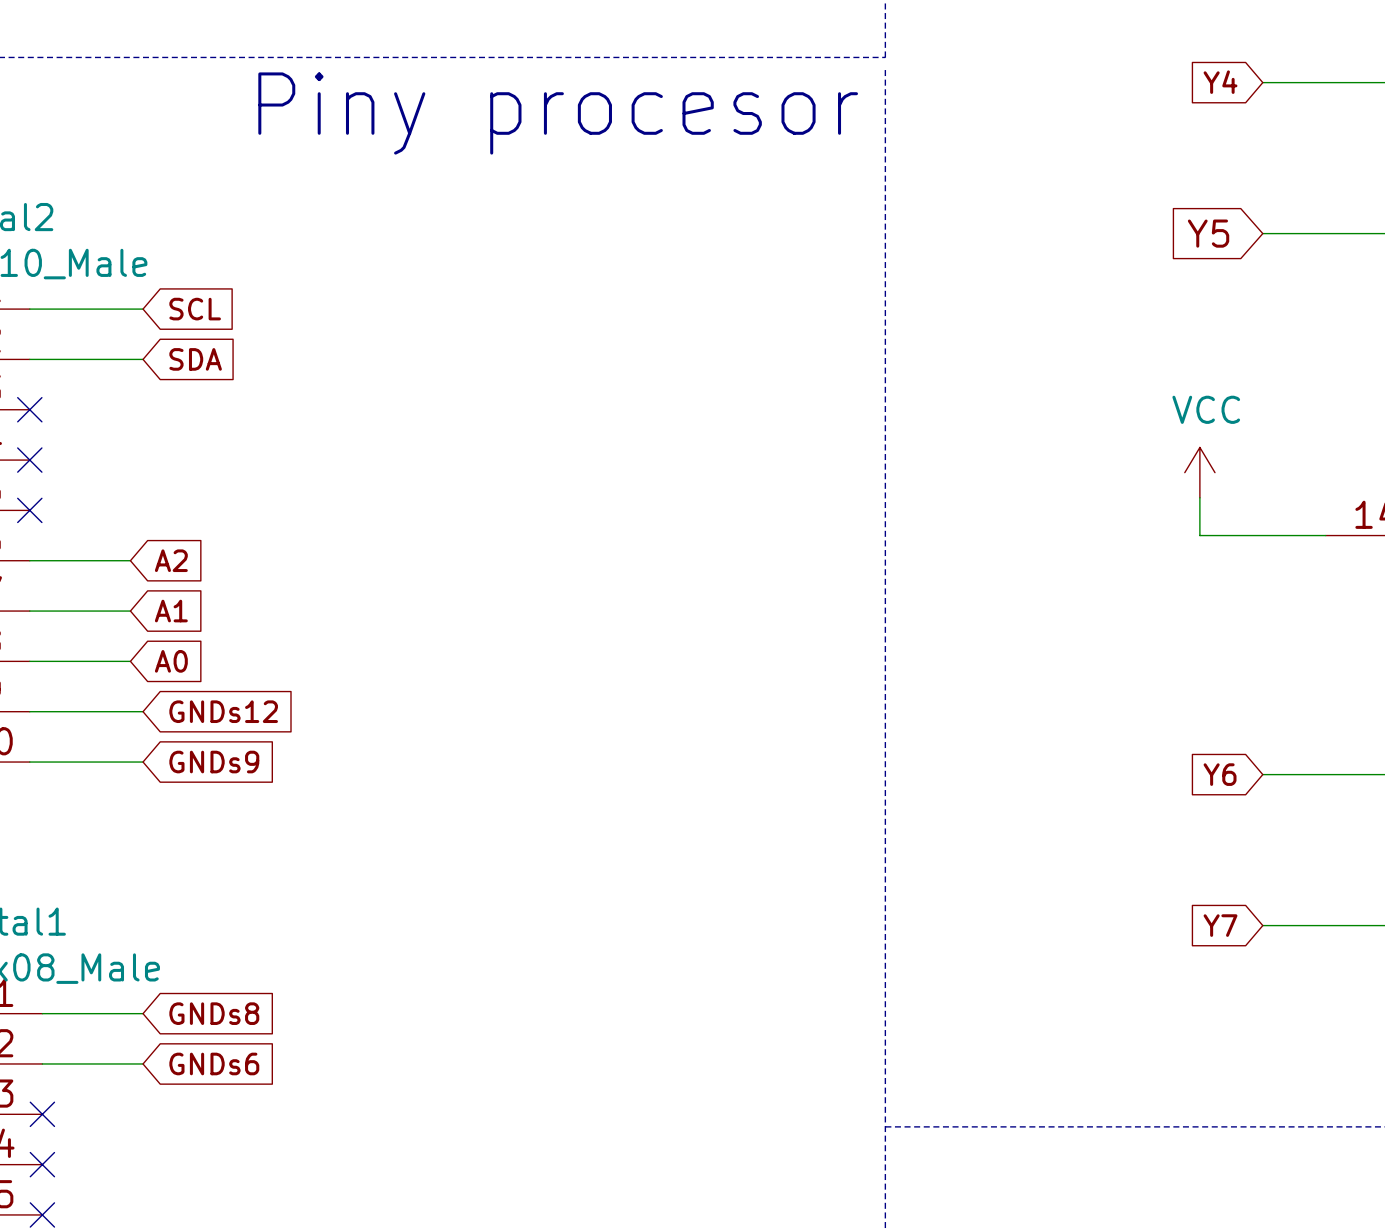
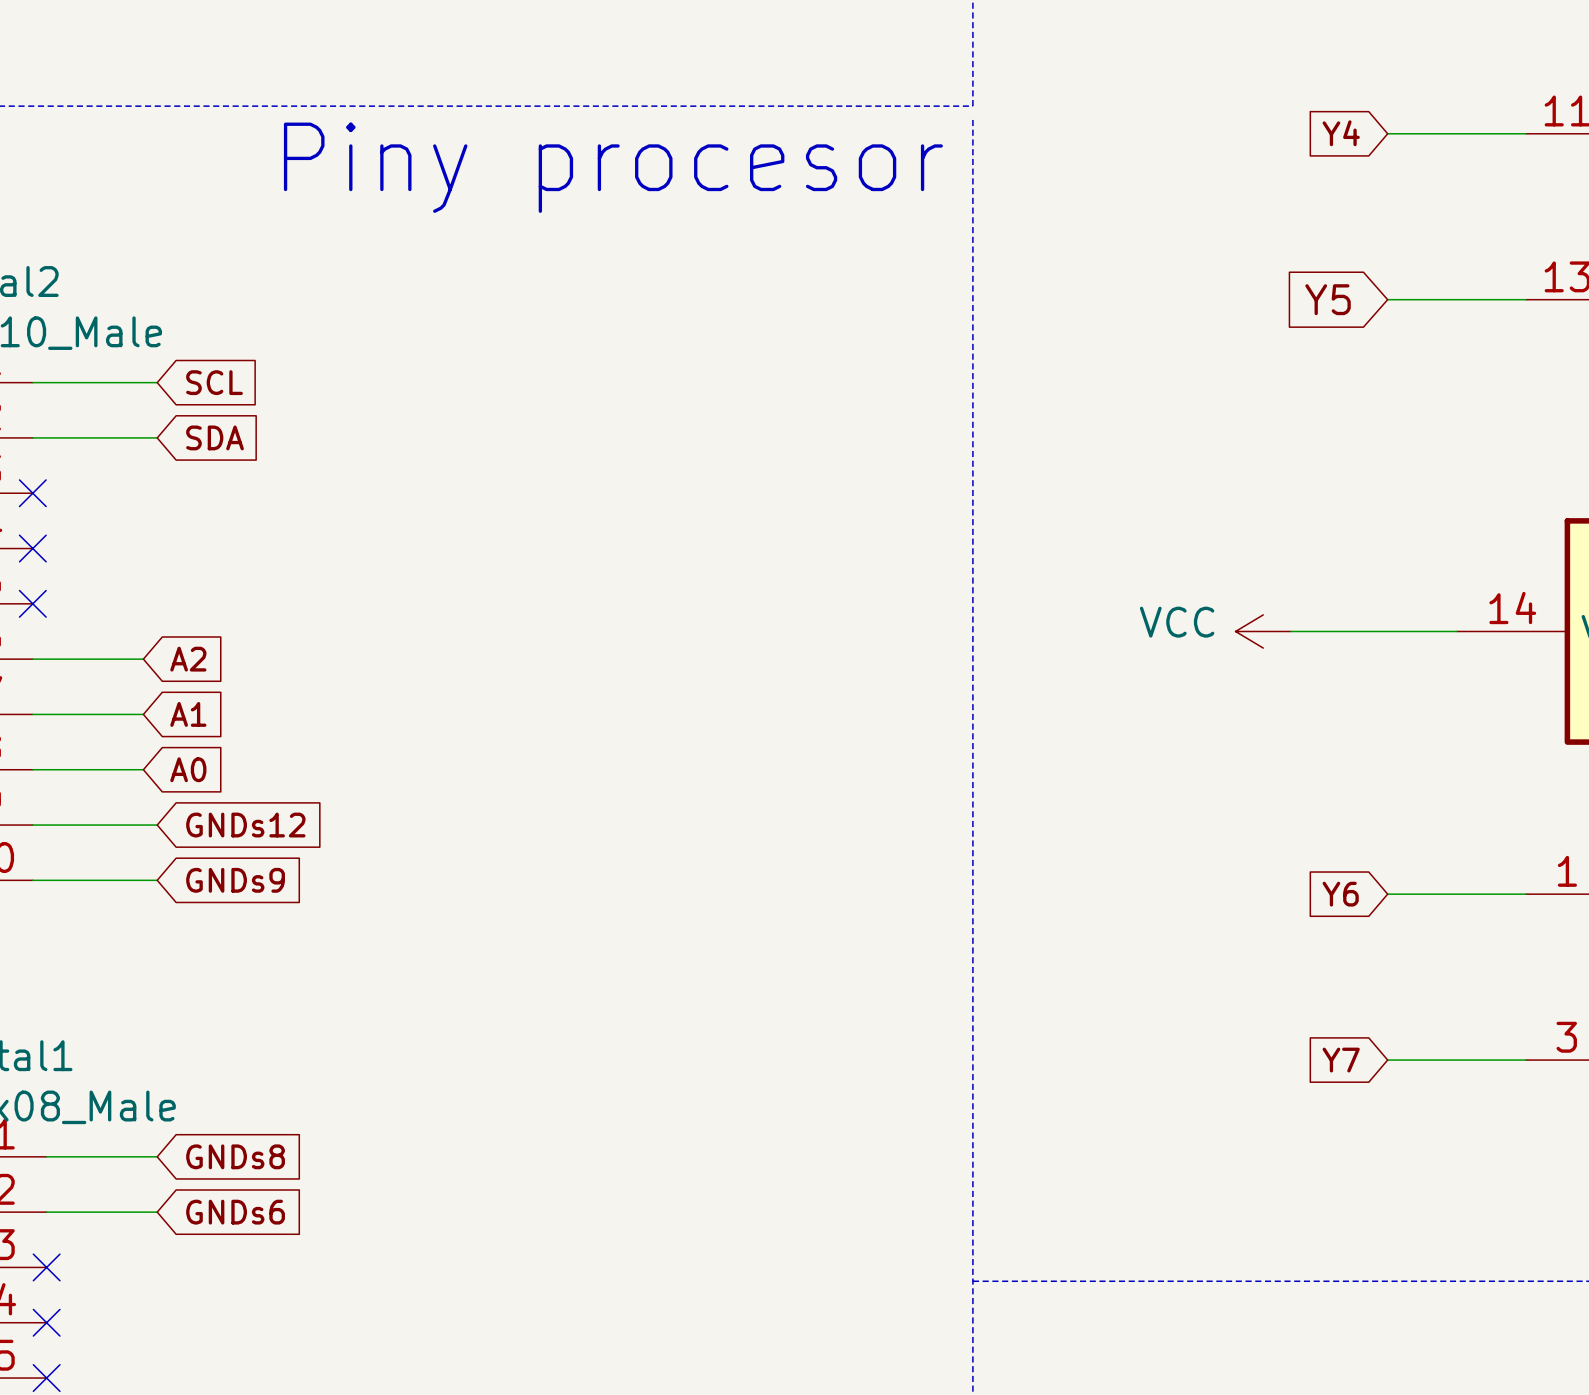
power symbol rotation: 0° (1199, 472) -> 90° counterclockwise (1263, 631)
power symbol position: VCC (1199, 472) -> VCC (1263, 631)
wire: (1199, 497) (1199, 535) -> (1290, 631) (1318, 631)

